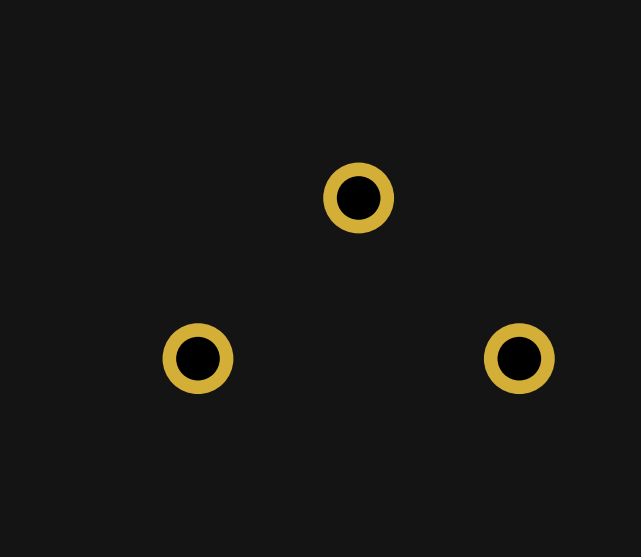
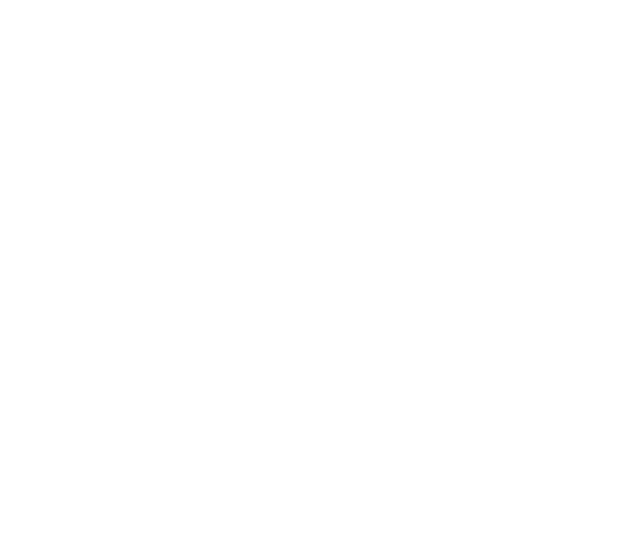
part: (358, 278) -> none

